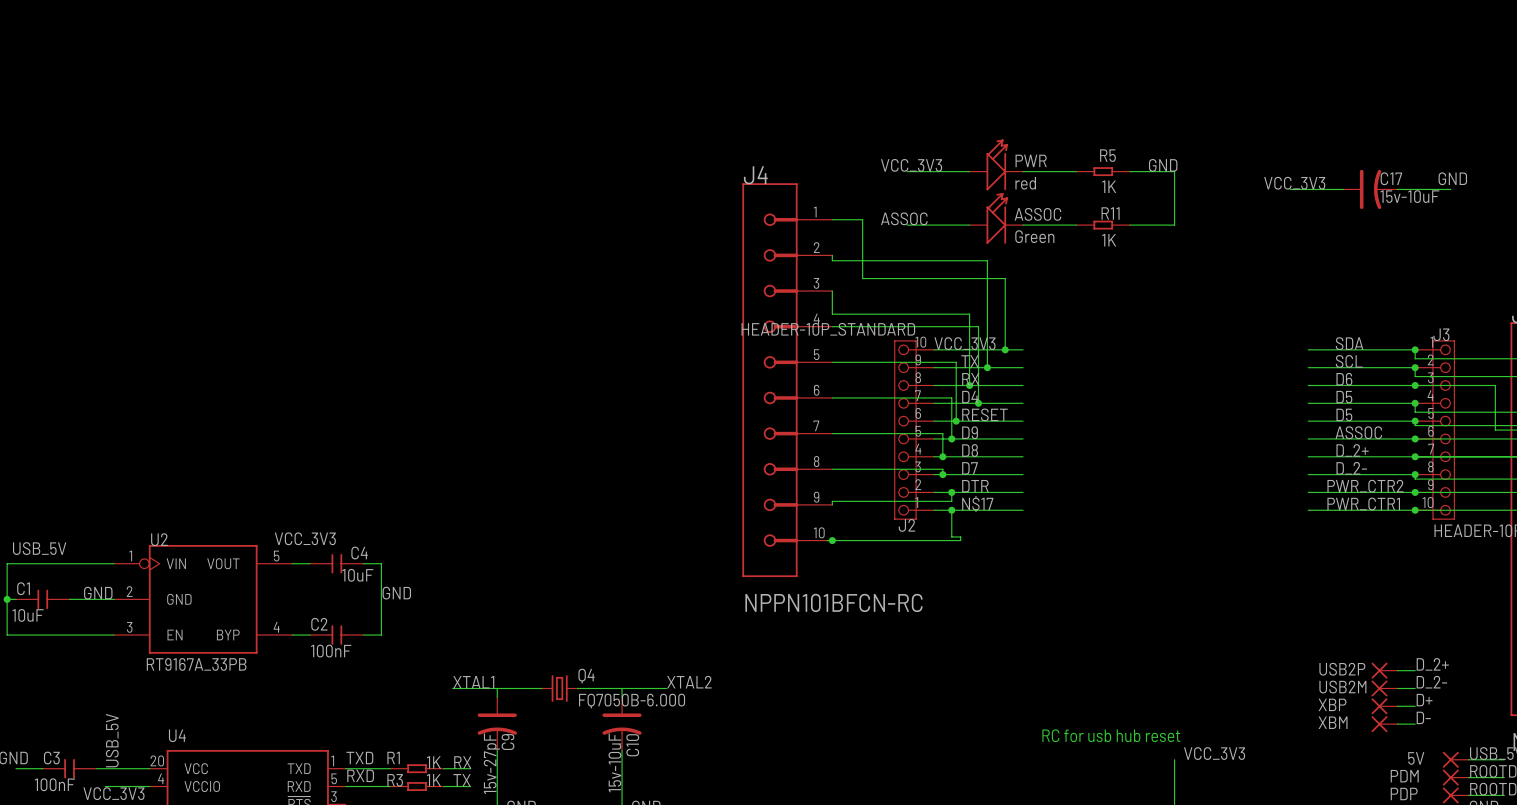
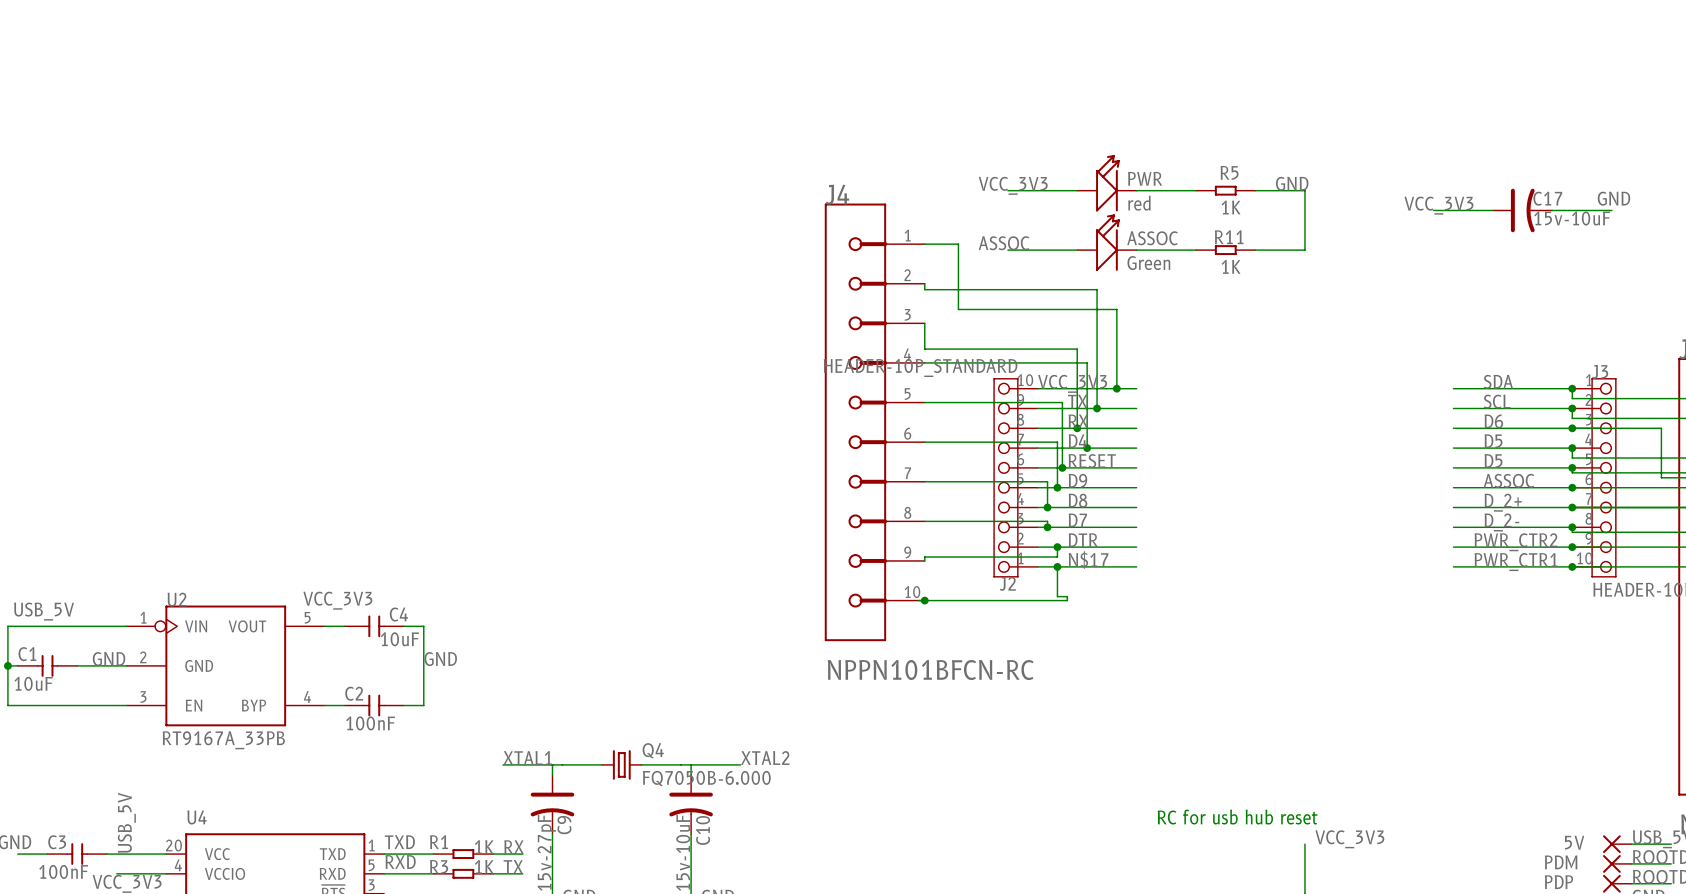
label: D_2+ (1432, 664) -> none
USB2P: (1384, 670) -> none
wire: (1397, 670) (1415, 670) -> none
label: D_2- (1431, 682) -> none
USB2M: (1384, 688) -> none
wire: (1397, 688) (1415, 688) -> none
label: D+ (1424, 700) -> none
XBP: (1384, 706) -> none
wire: (1397, 706) (1415, 706) -> none
label: D- (1423, 717) -> none
XBM: (1384, 724) -> none
wire: (1397, 724) (1415, 724) -> none

